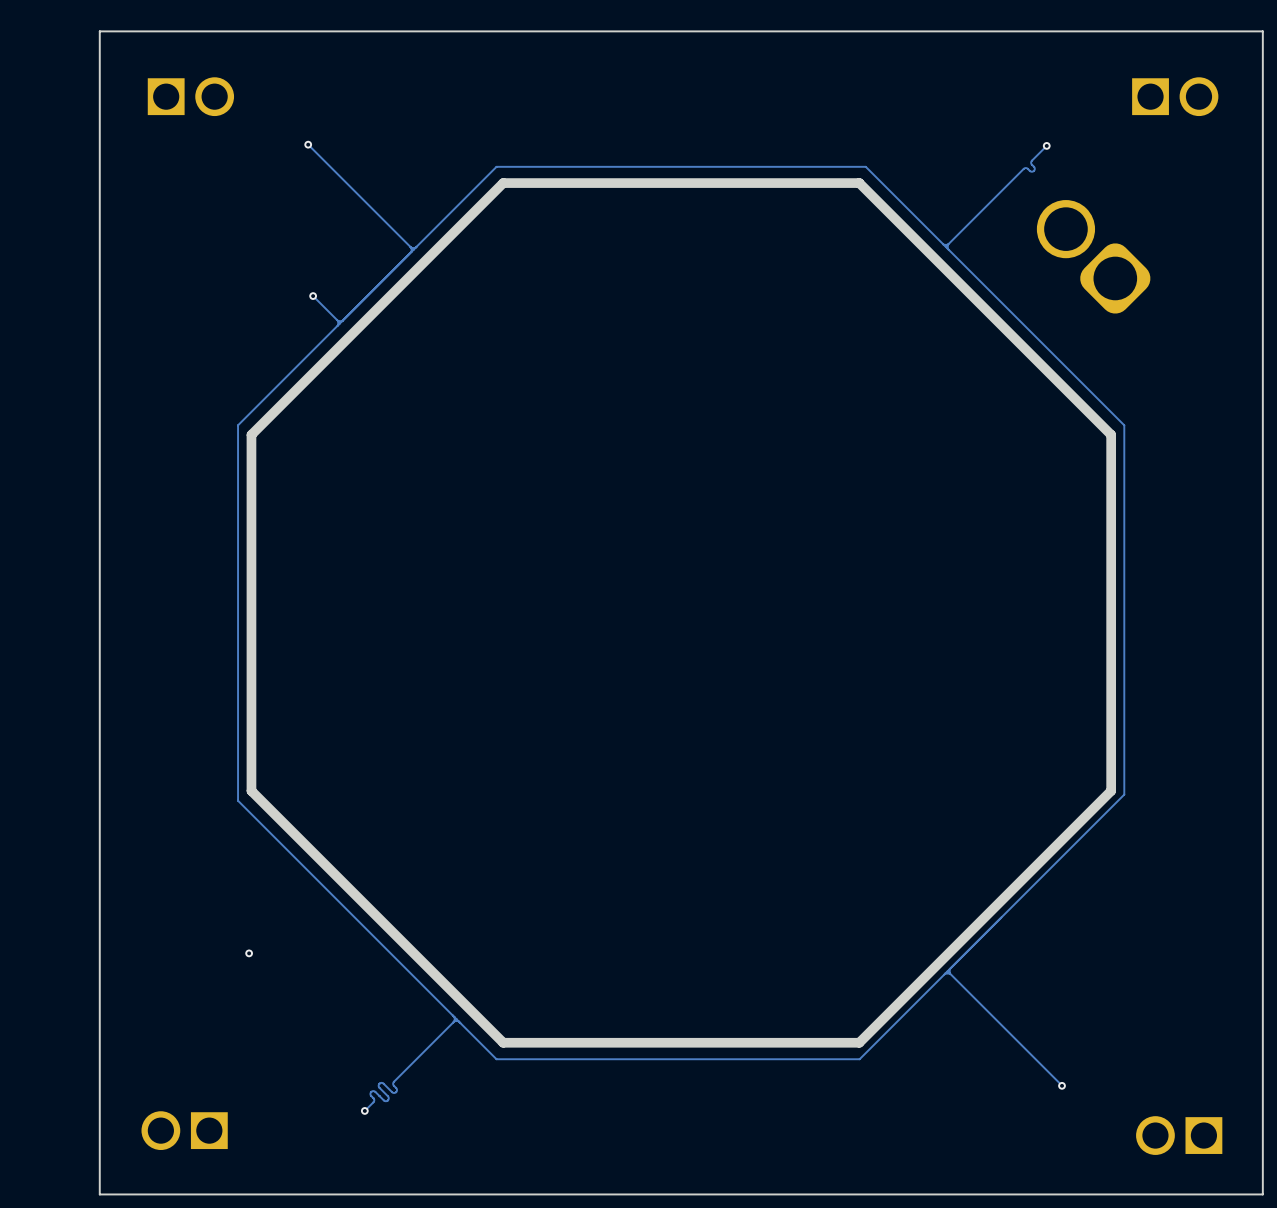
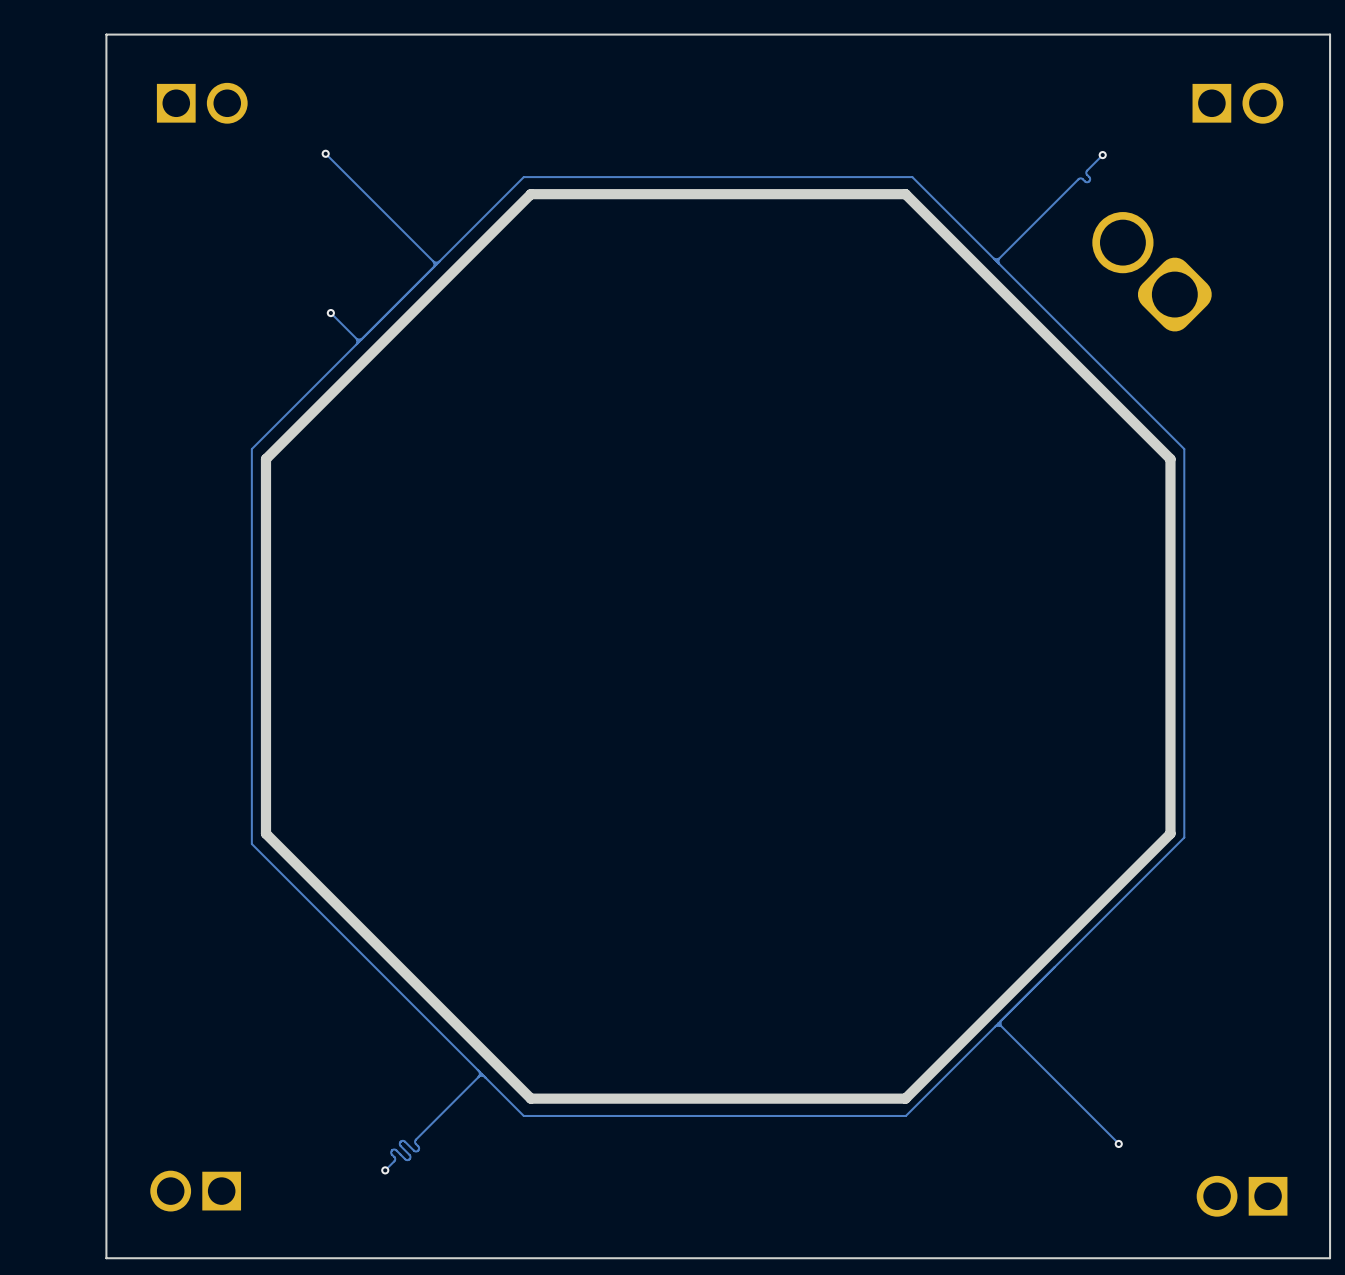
via: (249, 953) -> none

